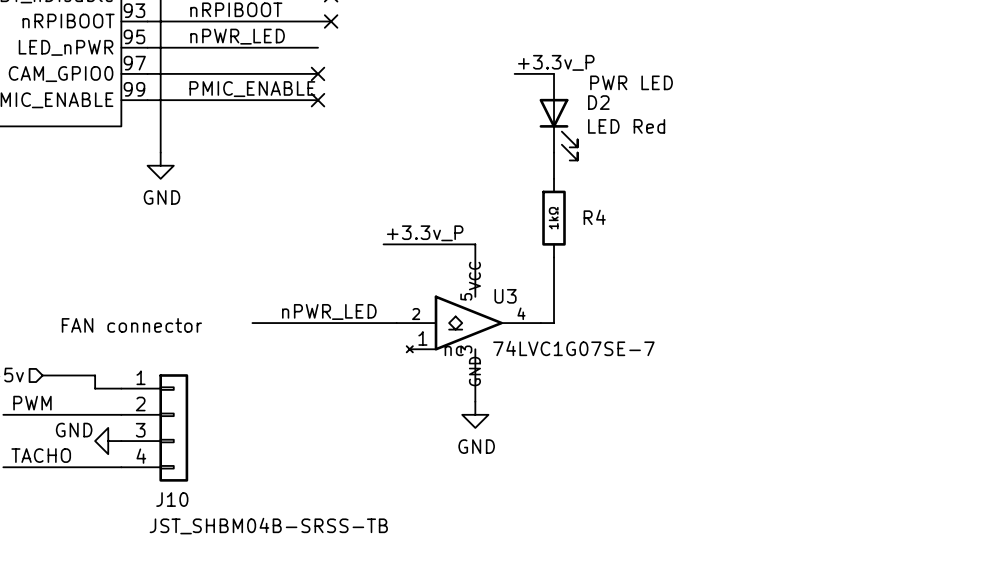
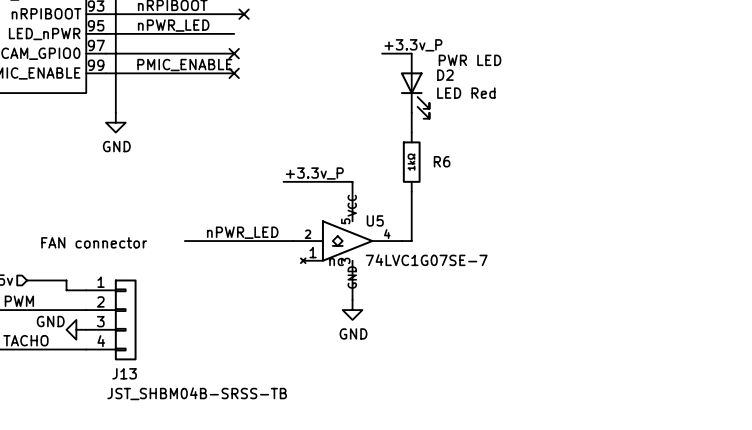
R4 name: R4 (594, 217) -> R6 (442, 161)
U3 name: U3 (505, 296) -> U5 (375, 220)
J10 name: J10 (172, 499) -> J13 (124, 373)

